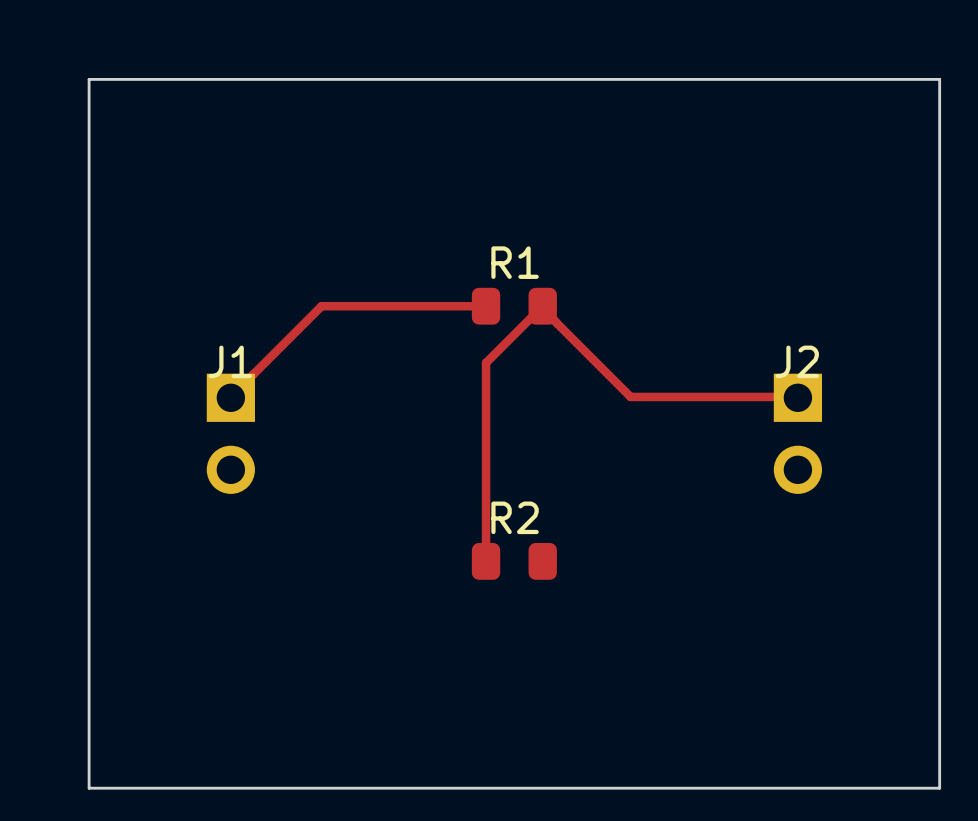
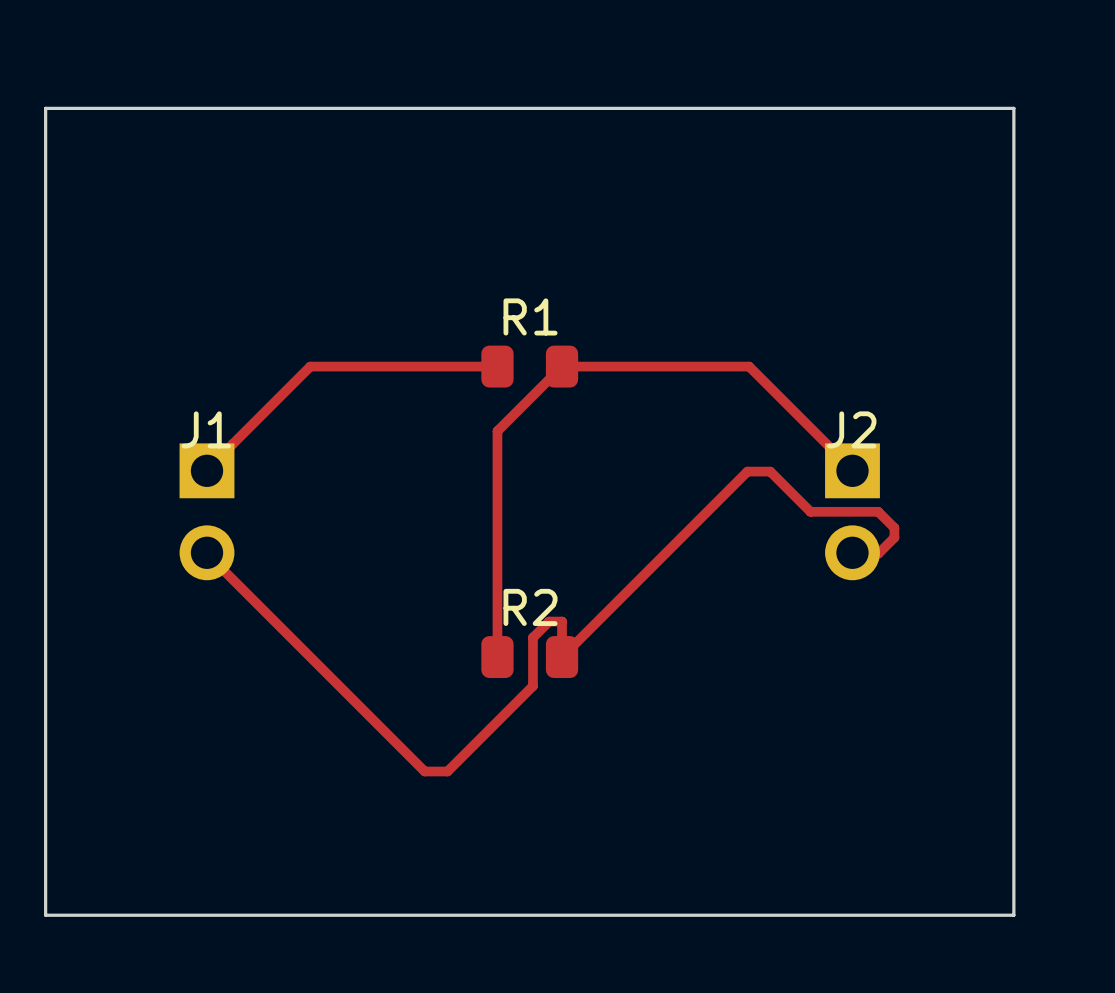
track: (542, 306) (556, 323) (630, 396) (797, 397) -> (562, 366) (749, 366) (852, 470)
track: none -> (207, 552) (424, 771) (447, 771) (532, 686) (532, 637) (549, 621) (562, 621) (562, 657) (747, 471) (770, 471) (810, 511) (878, 511) (894, 527) (894, 537) (878, 553) (868, 553)

